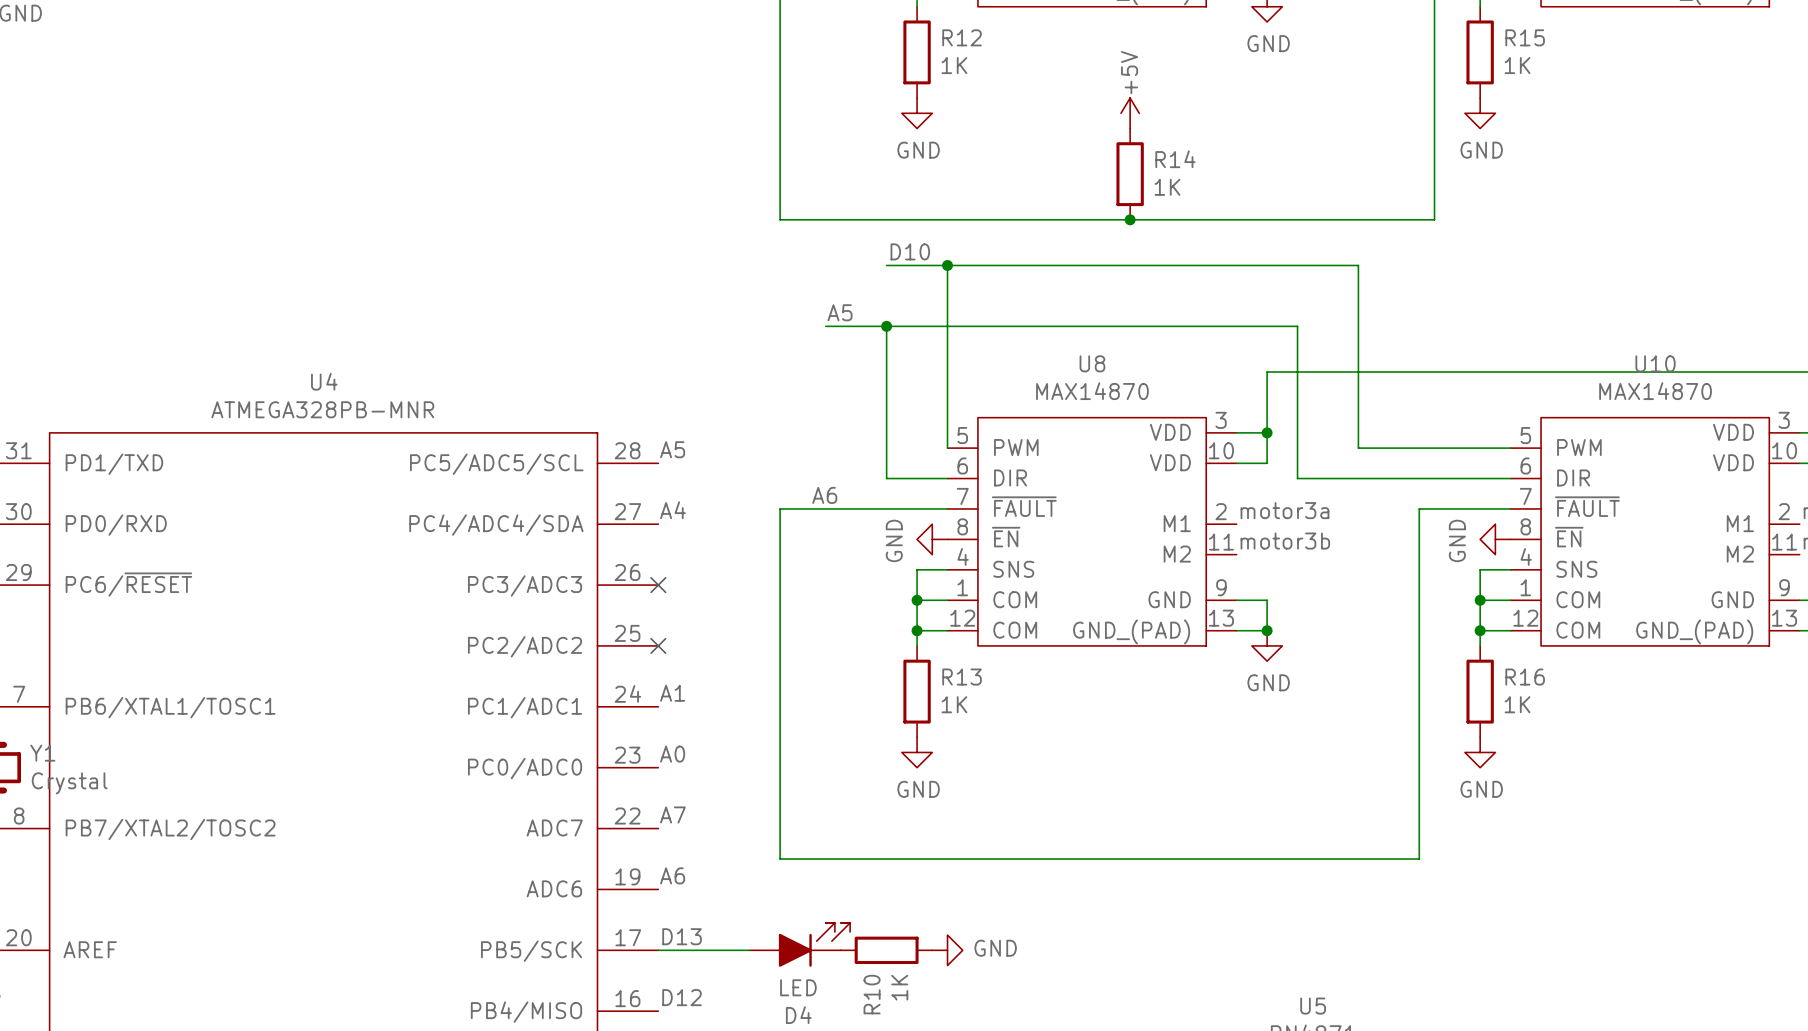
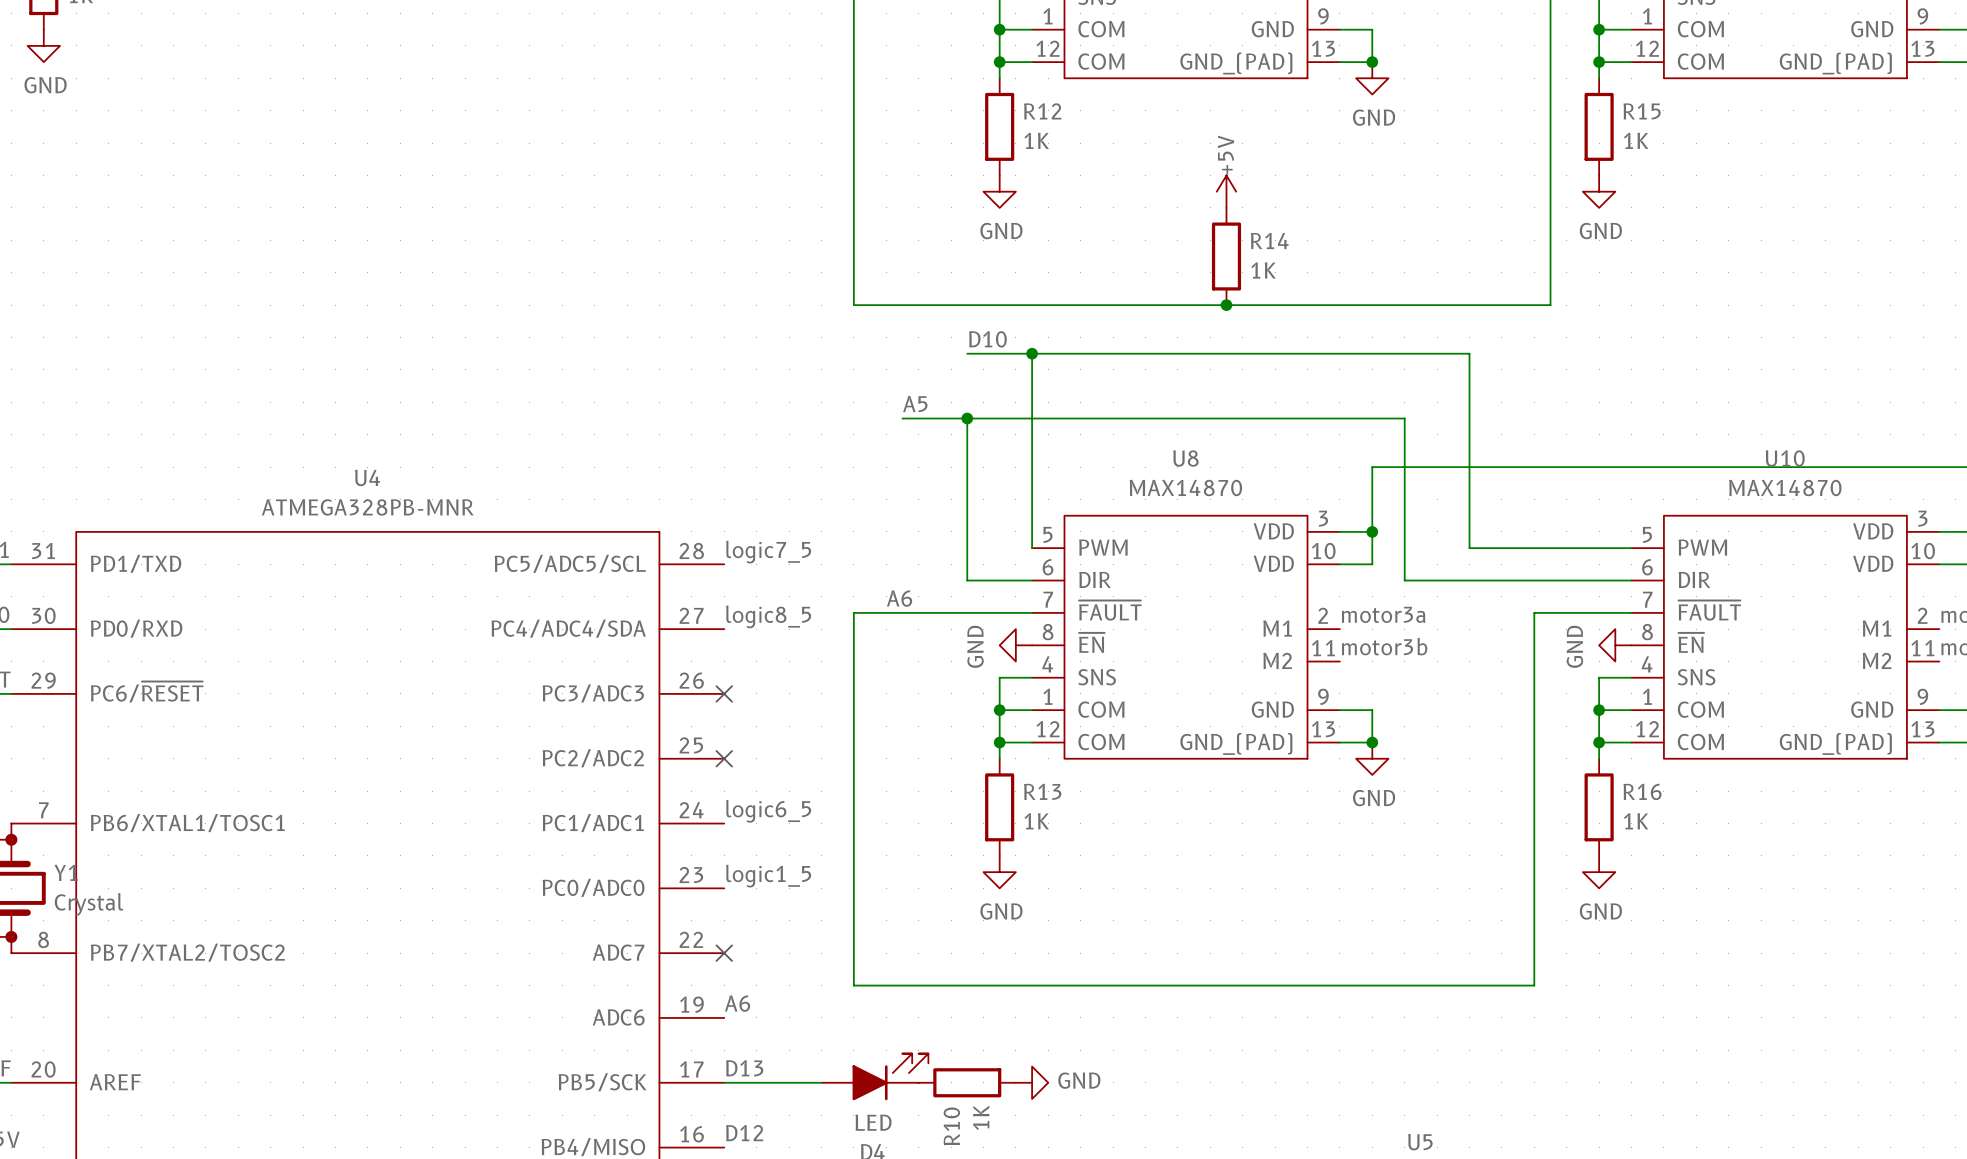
label: A5 (672, 449) -> logic7_5 (768, 552)
label: A4 (672, 510) -> logic8_5 (768, 616)
label: A1 (672, 693) -> logic6_5 (768, 811)
label: A0 (672, 754) -> logic1_5 (768, 876)
label: A7 (672, 814) -> none
no-connect mark: none -> (724, 953)

